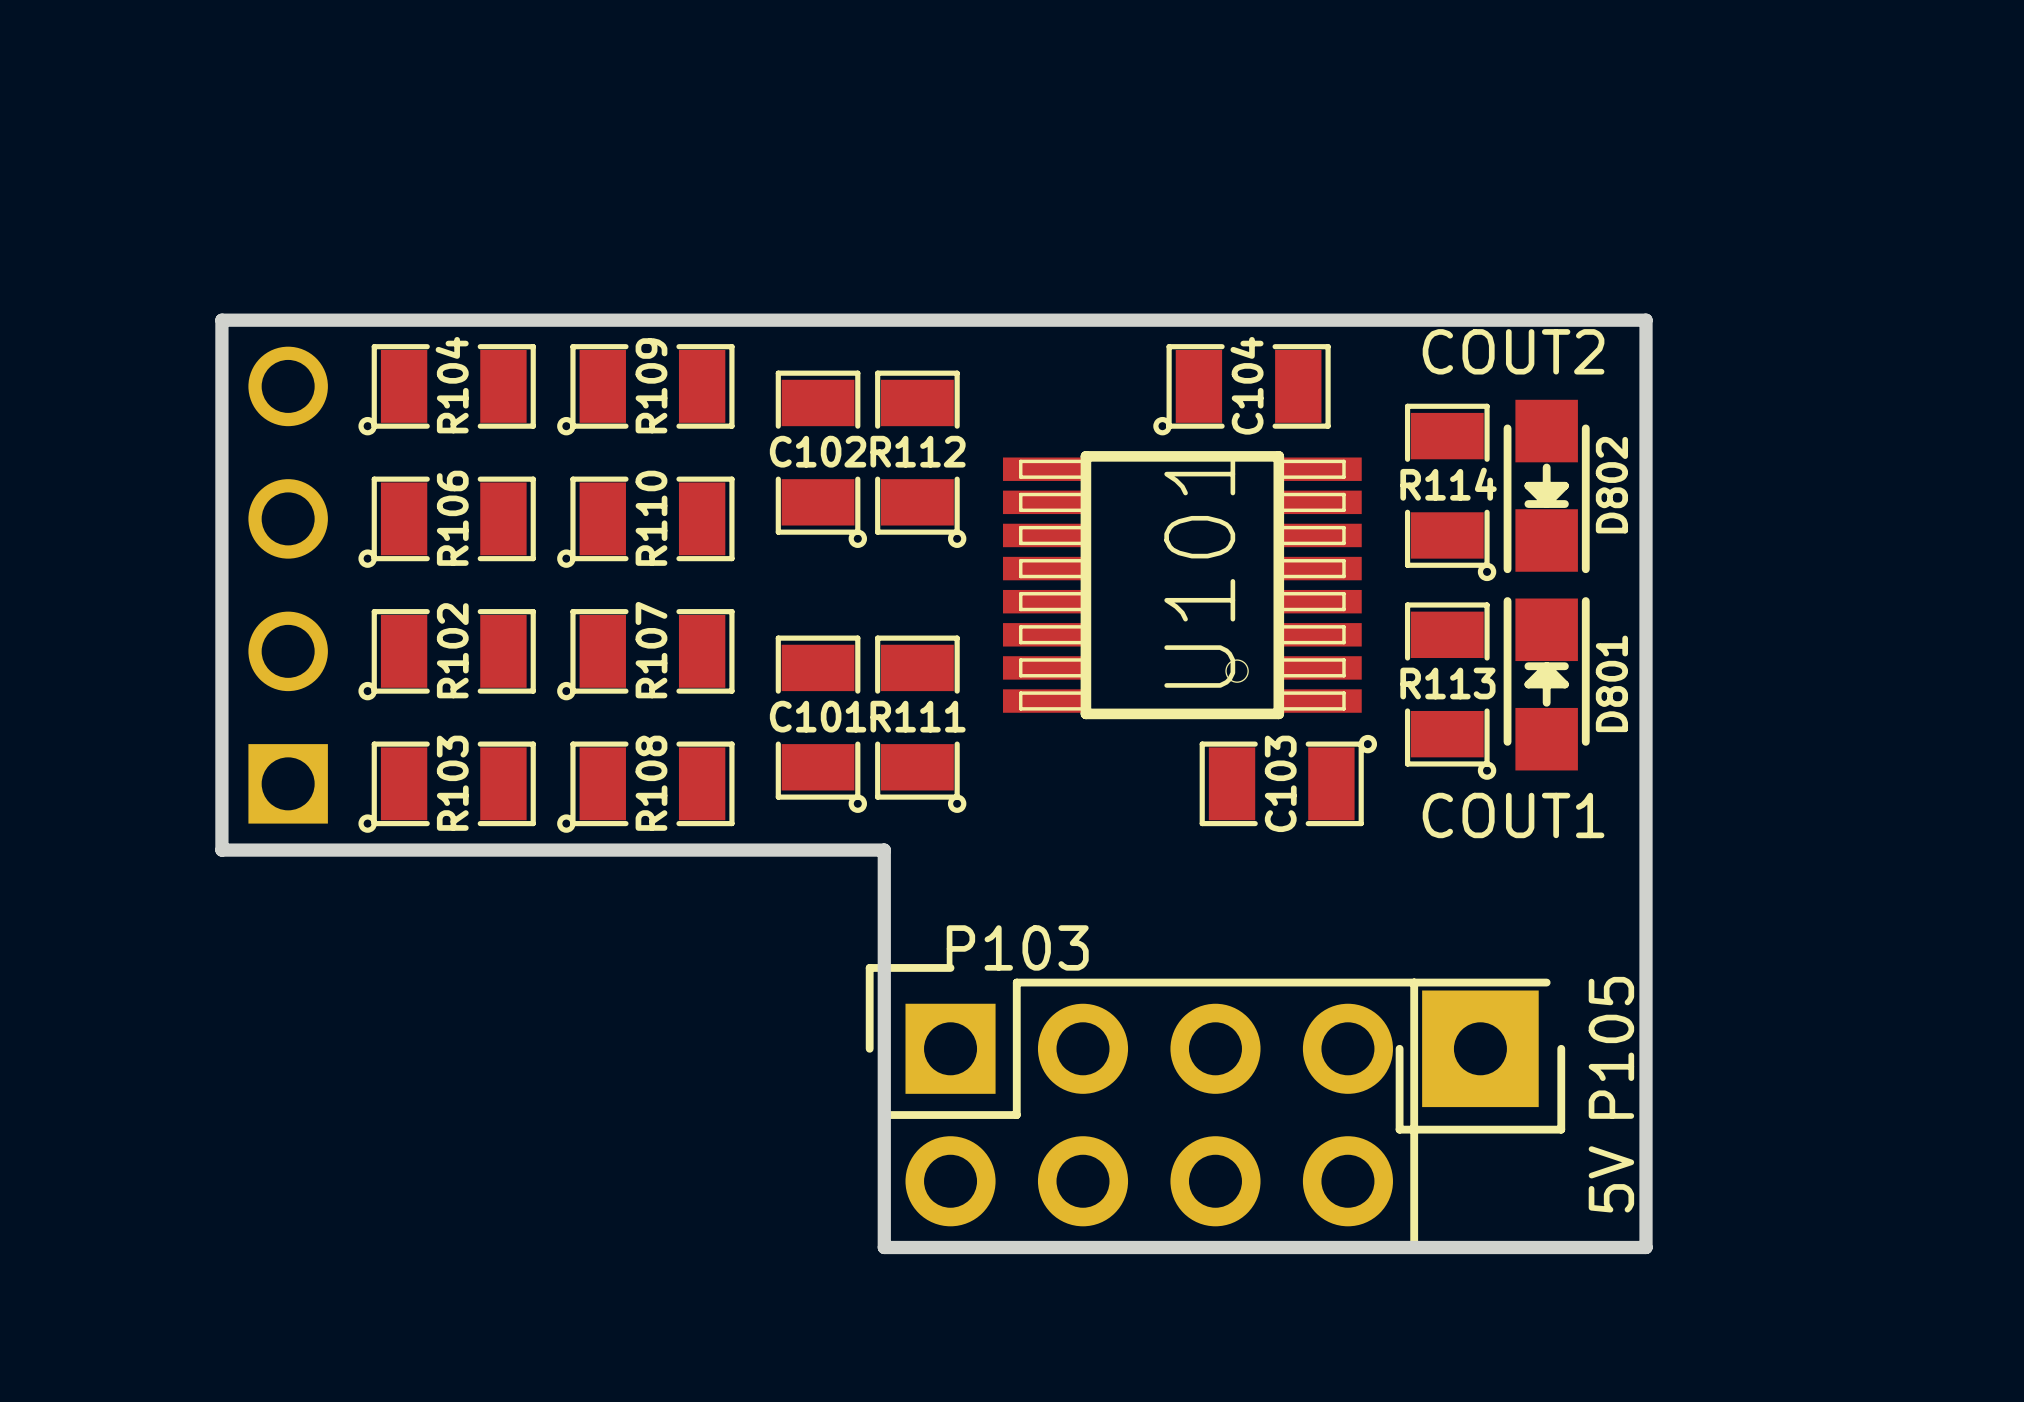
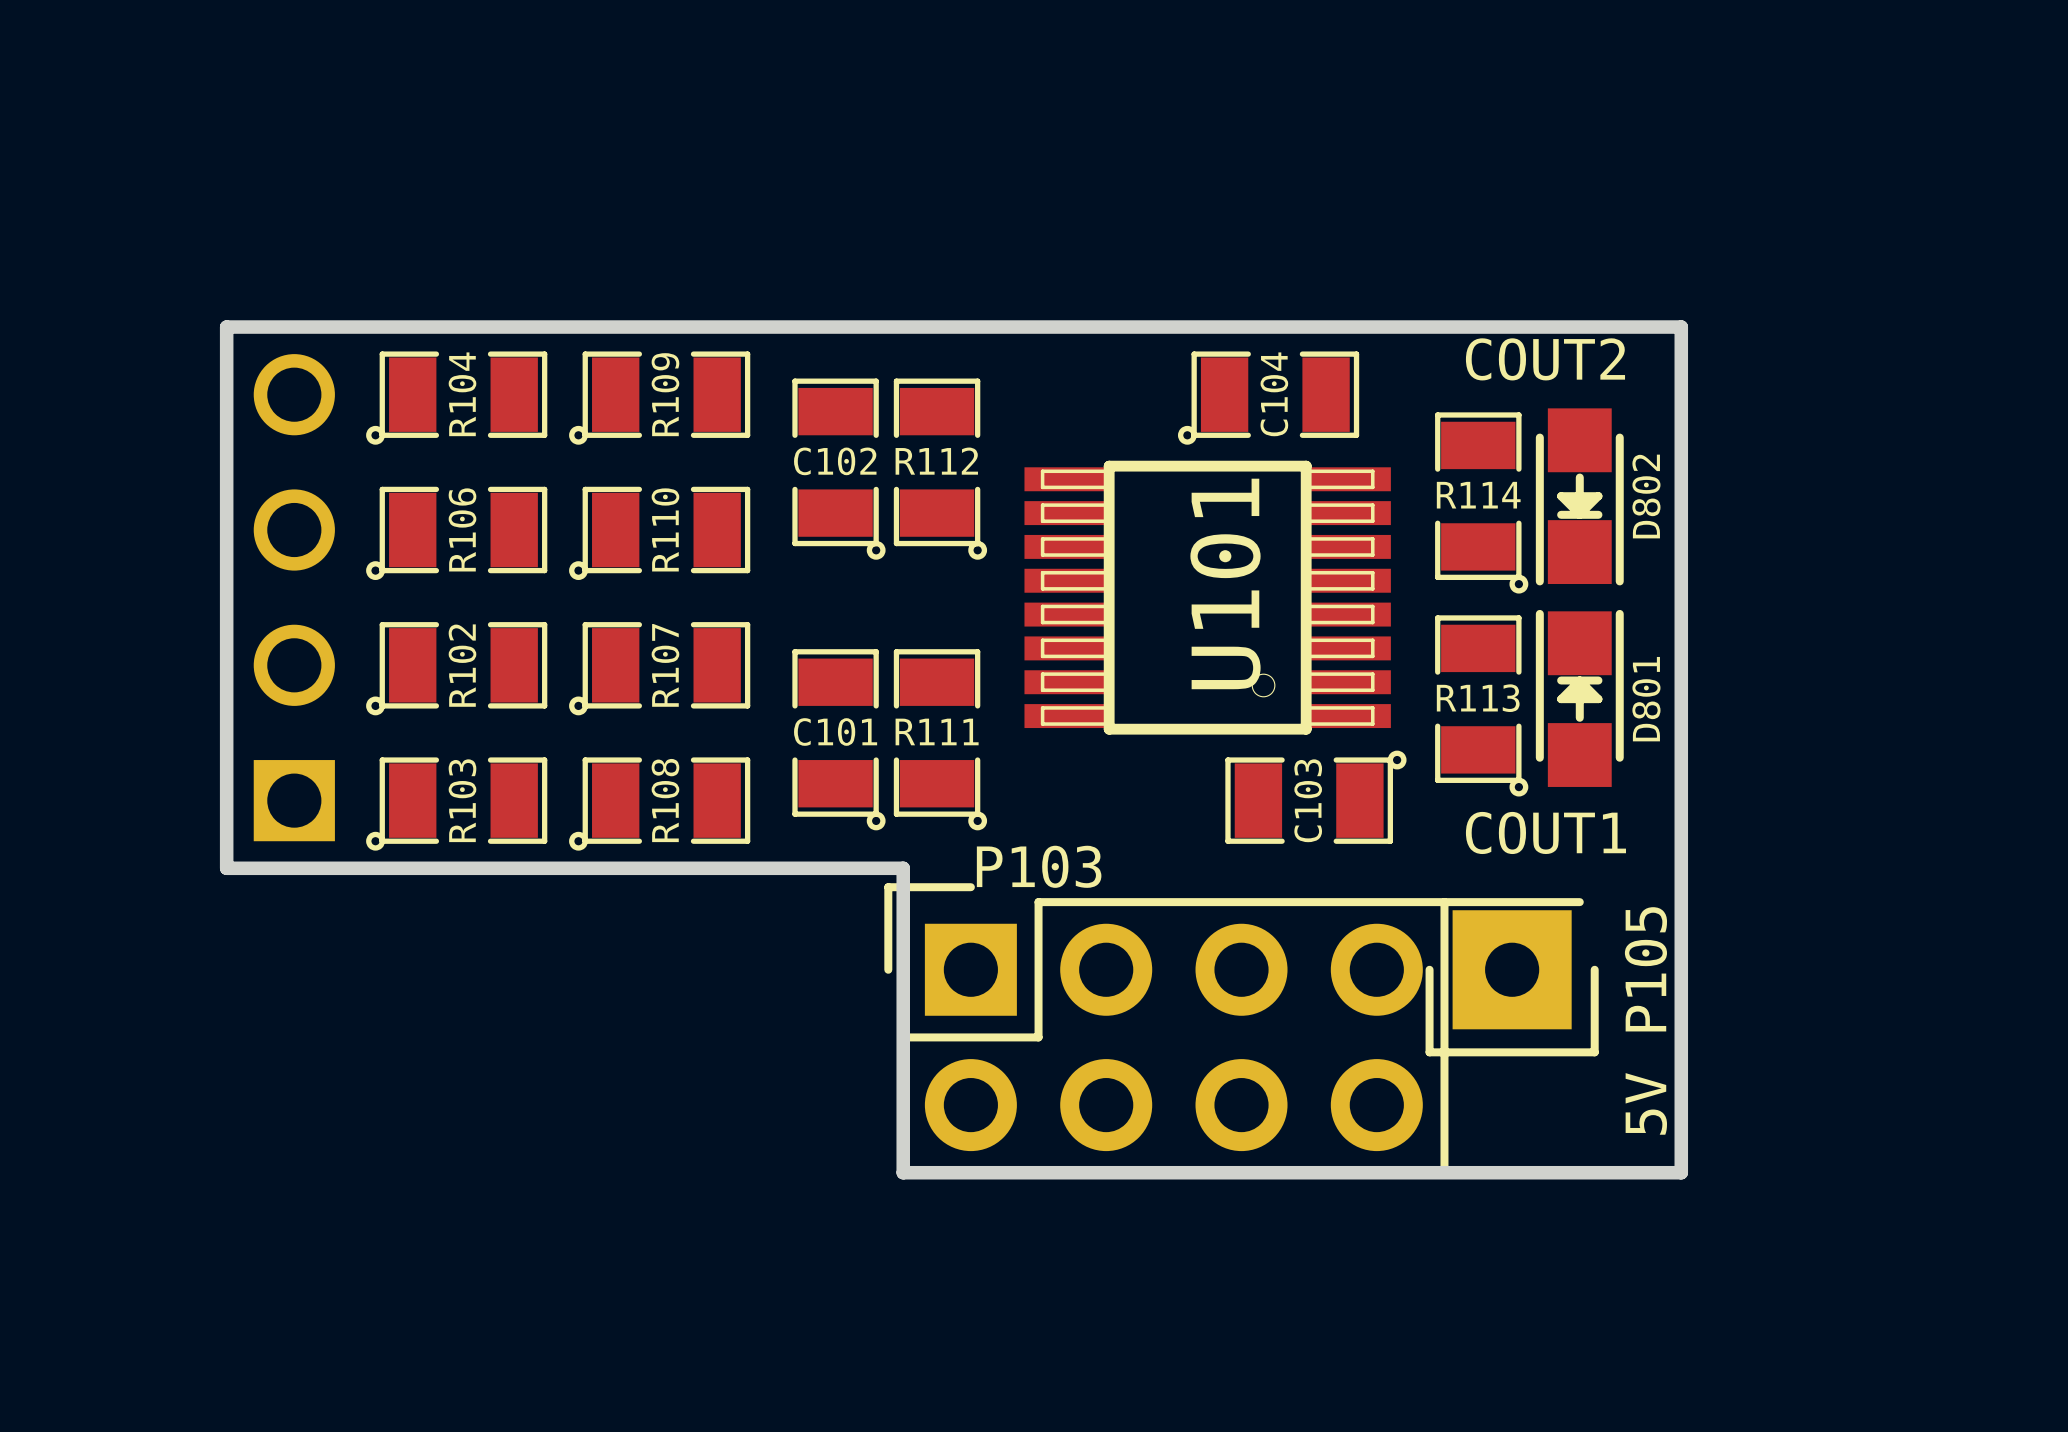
P105 position: (1480, 1056) -> (1512, 977)
P103 position: (1141, 1107) -> (1166, 1029)
board edge: (884, 1148) (884, 1247) (1646, 1247) (1646, 1148) -> (903, 1172) (1681, 1172)
text position: 5V (1611, 1179) -> 5V (1646, 1103)

